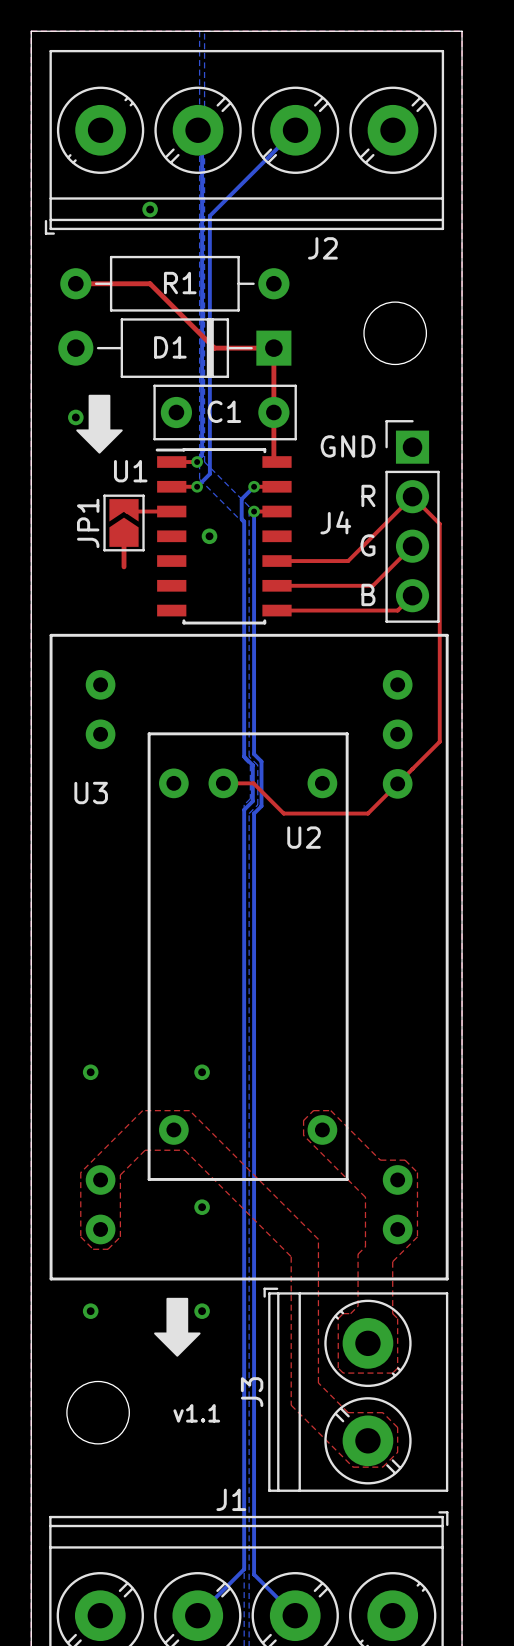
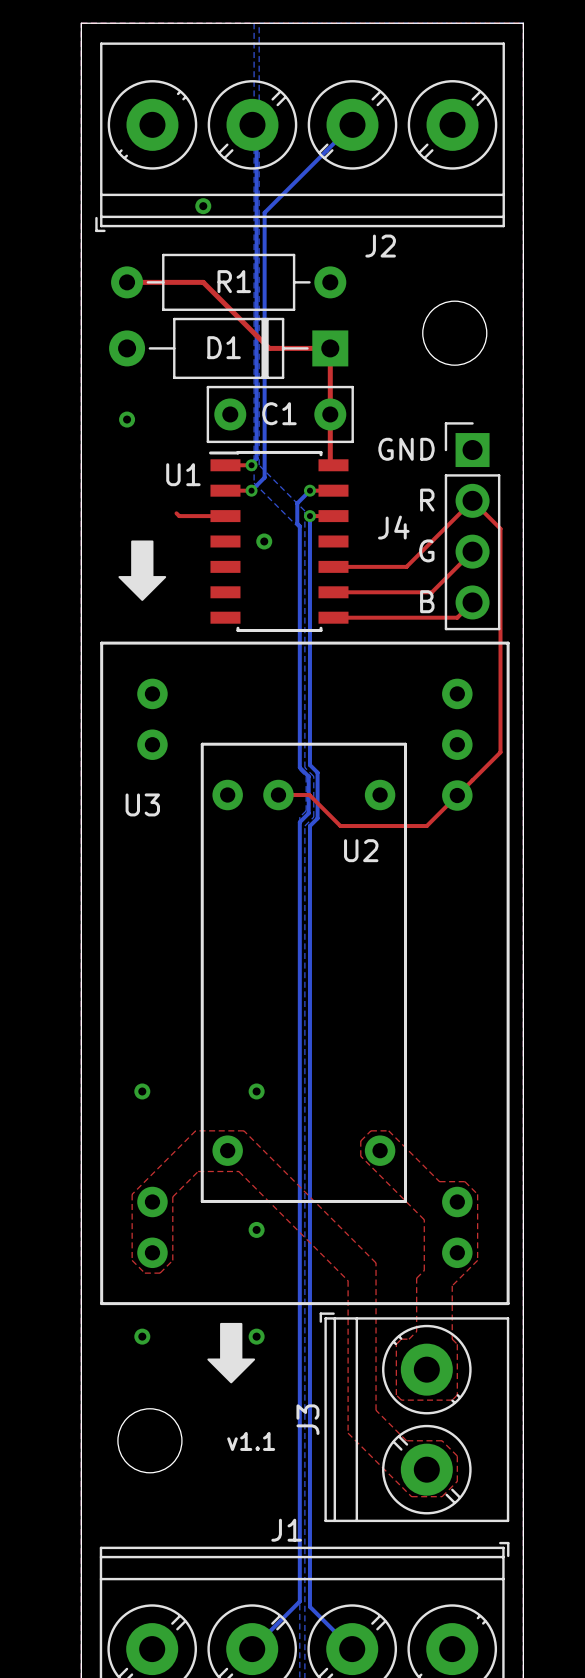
drawing position: (99, 424) -> (142, 570)
JP1: (124, 522) -> none
top track: (124, 537) (124, 566) -> none

